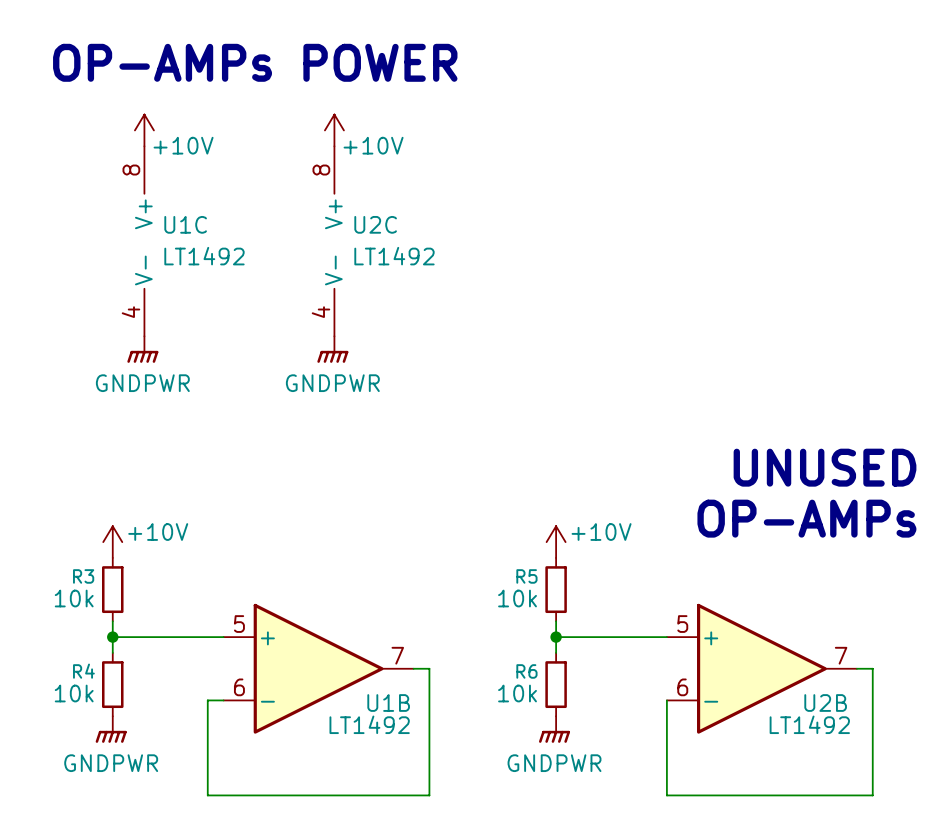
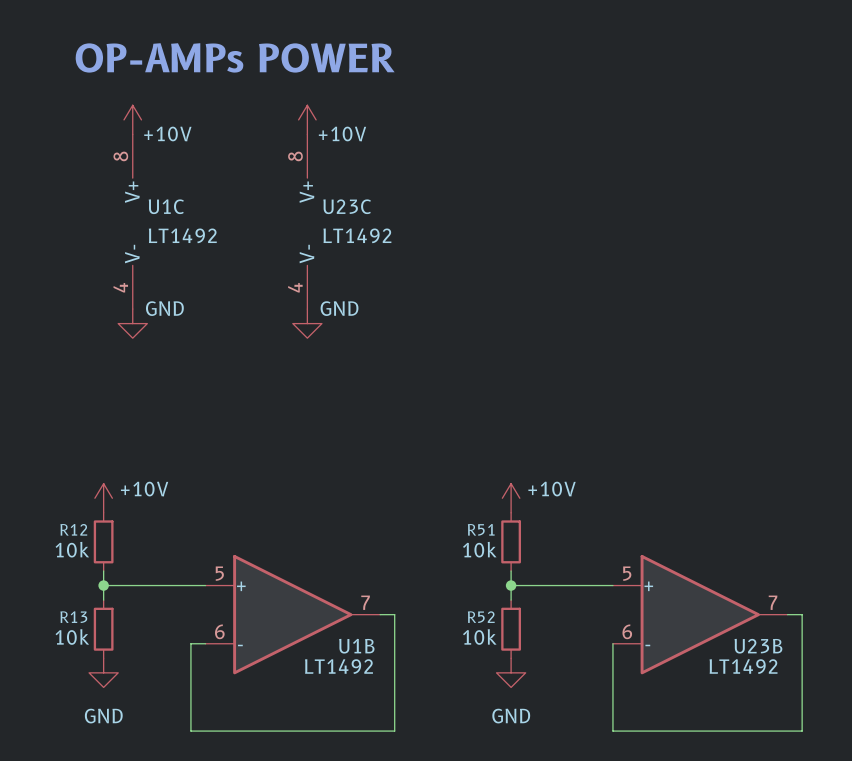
U2C name: U2C (375, 224) -> U23C (347, 206)
power symbol: GNDPWR (142, 349) -> GND (132, 323)
power symbol: GNDPWR (332, 349) -> GND (307, 323)
text: UNUSED (825, 467) -> none
text: OP-AMPs (806, 518) -> none
R3 name: R3 (83, 576) -> R12 (73, 529)
R5 name: R5 (526, 576) -> R51 (481, 529)
R4 name: R4 (83, 671) -> R13 (73, 617)
R6 name: R6 (526, 671) -> R52 (481, 617)
U2B name: U2B (825, 703) -> U23B (758, 646)
power symbol: GNDPWR (111, 729) -> GND (103, 672)
power symbol: GNDPWR (554, 729) -> GND (511, 672)

